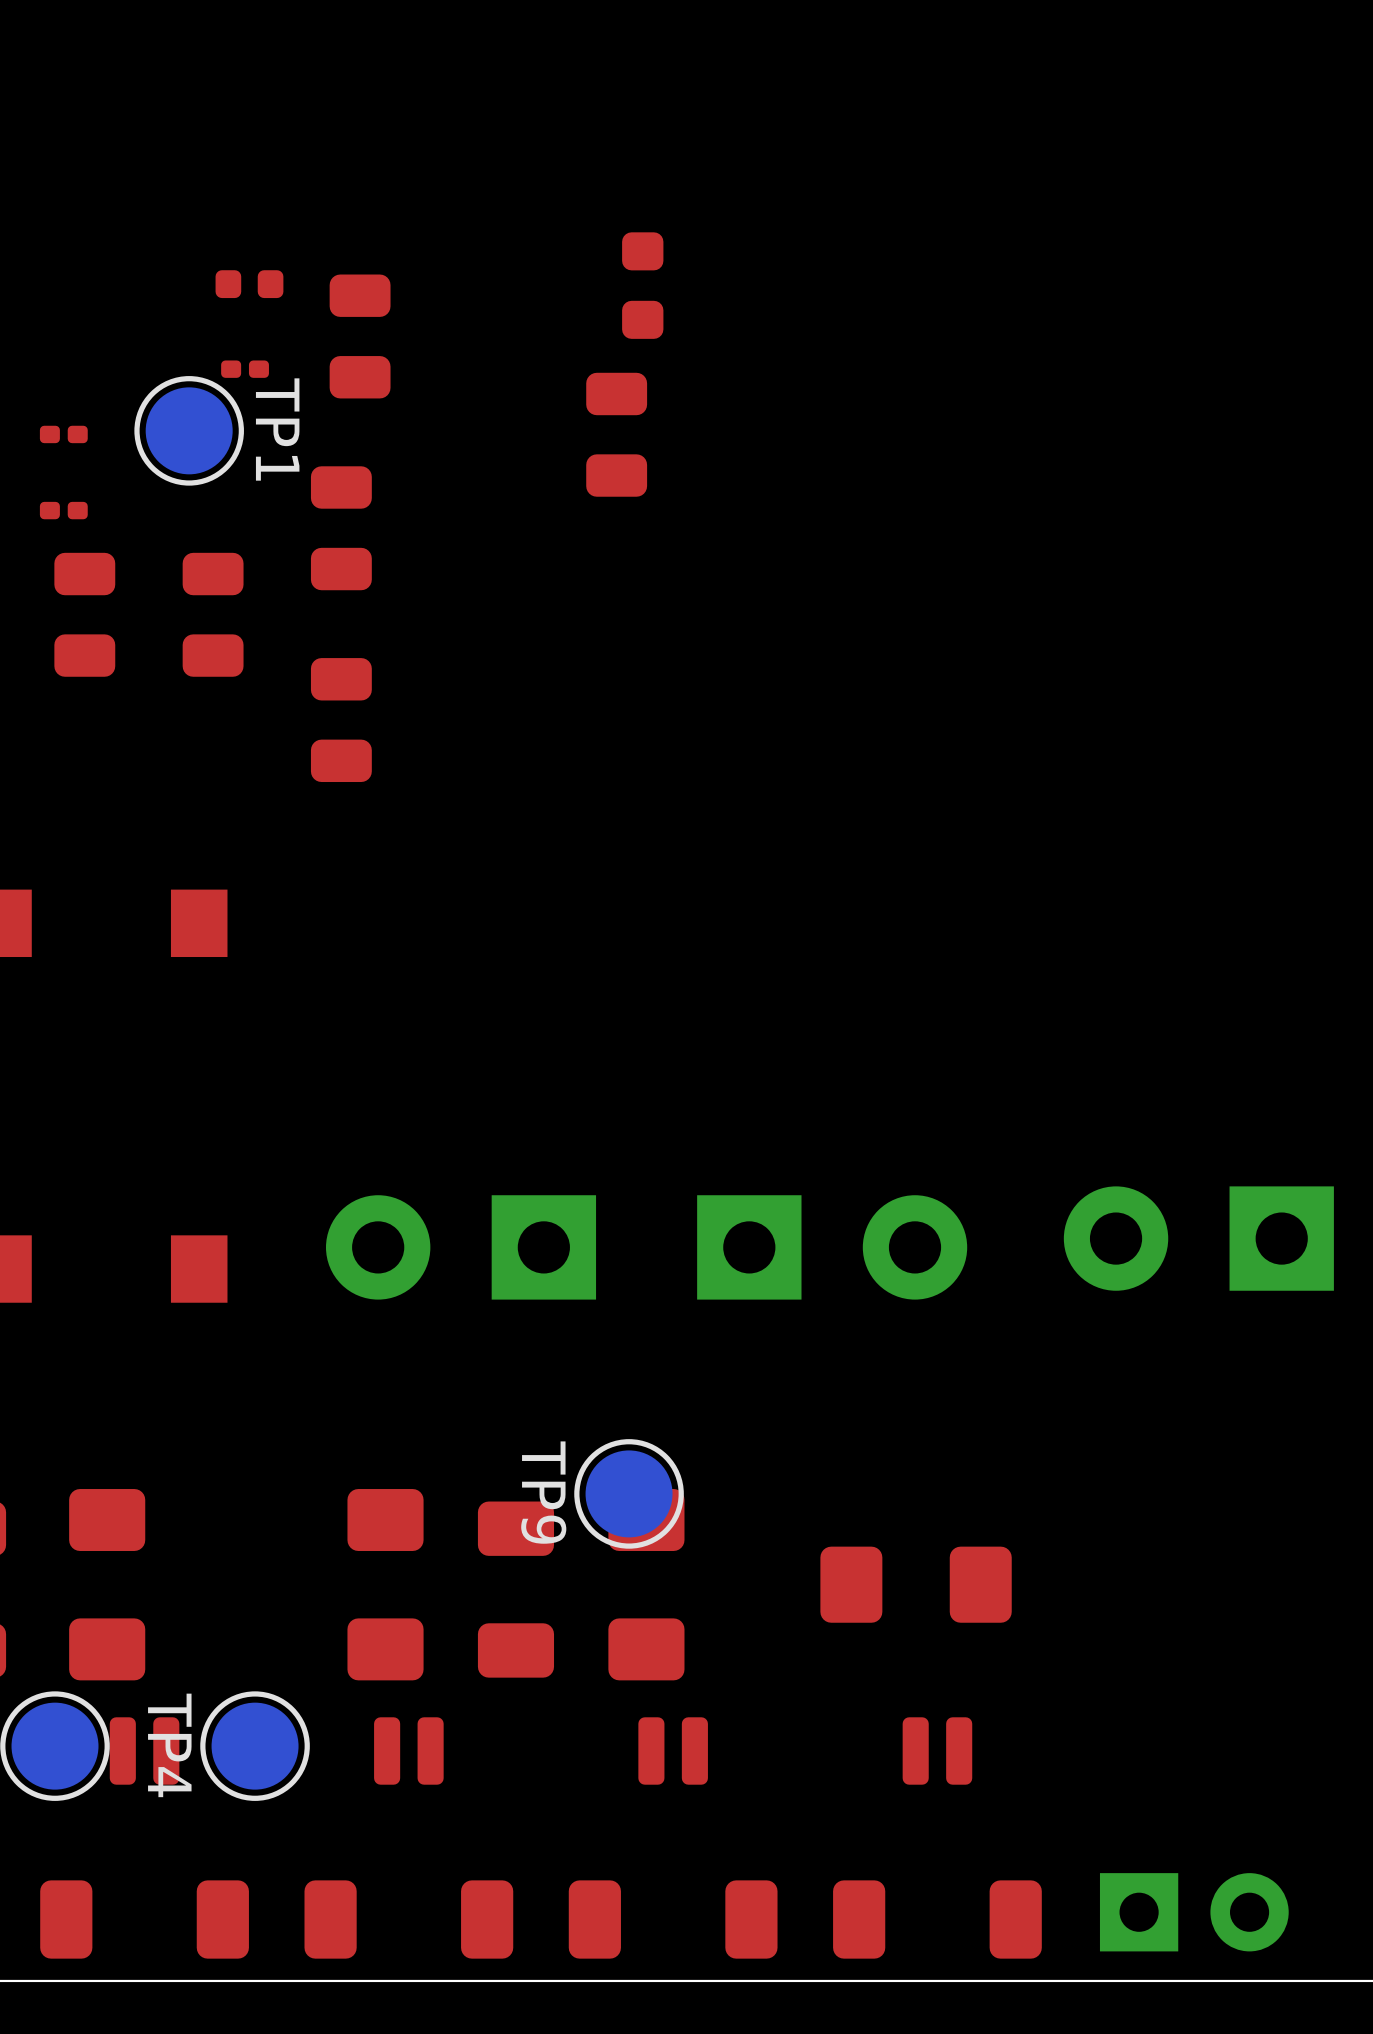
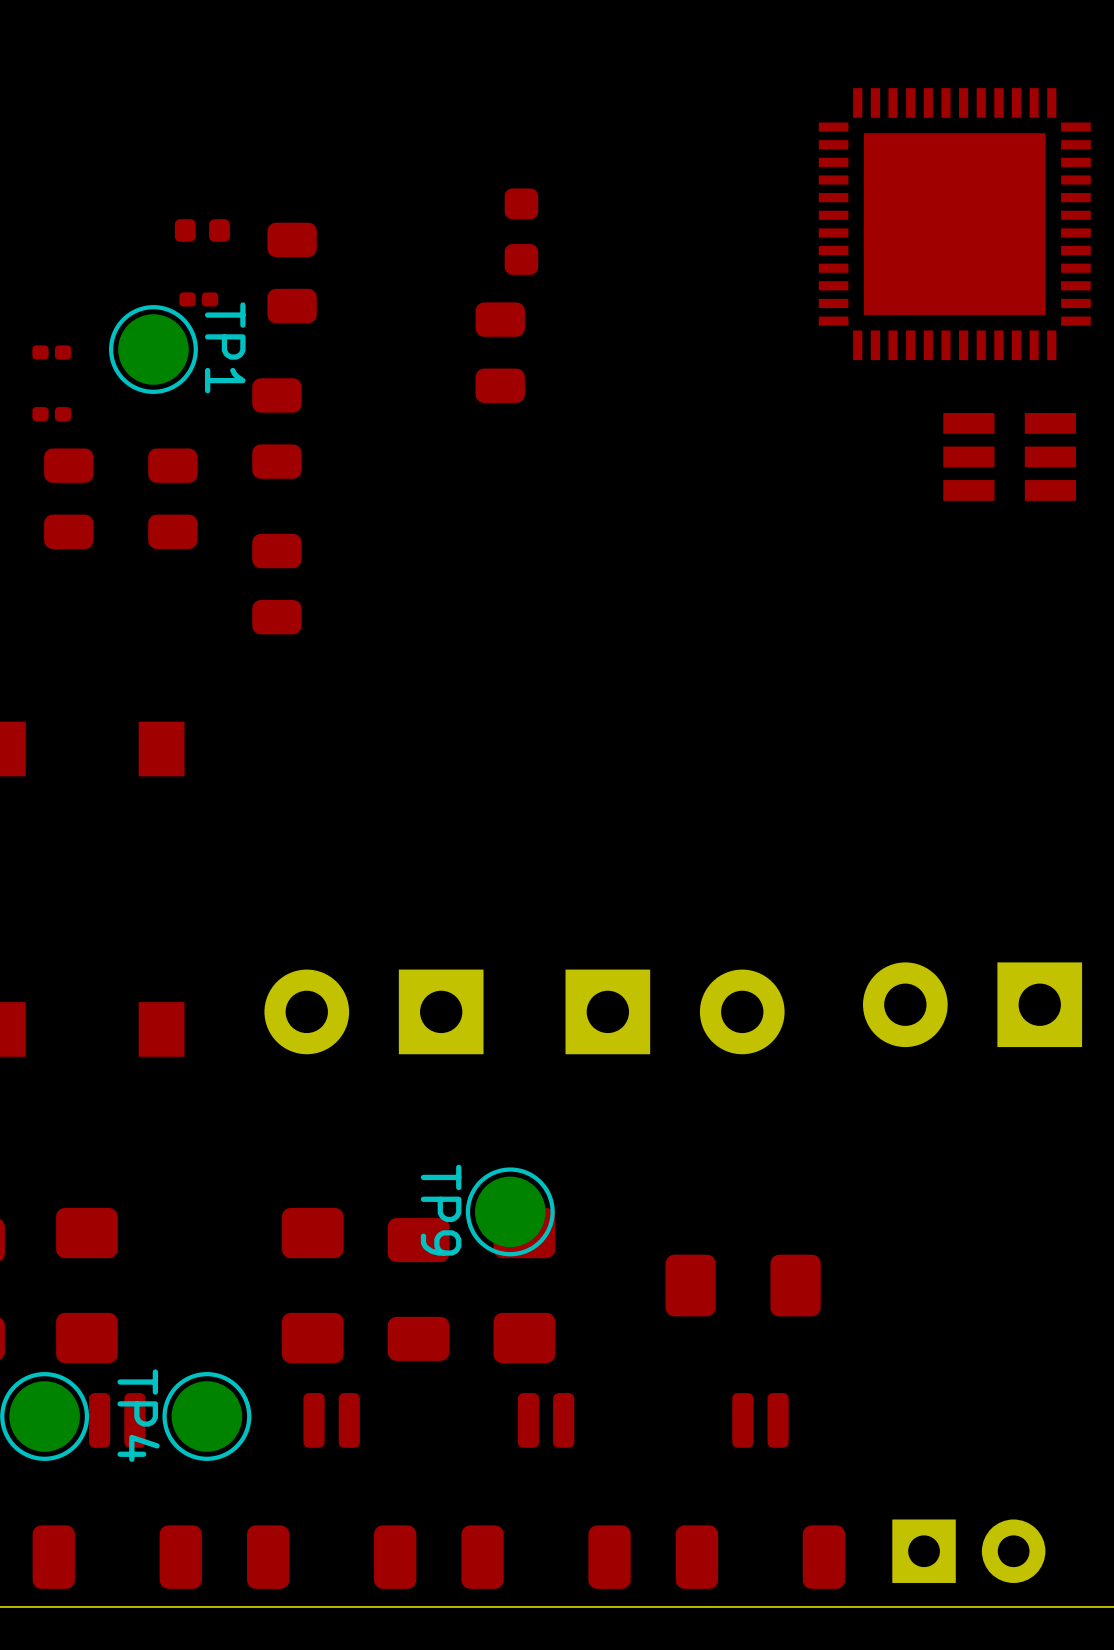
part: none -> (954, 224)
part: none -> (1009, 456)

